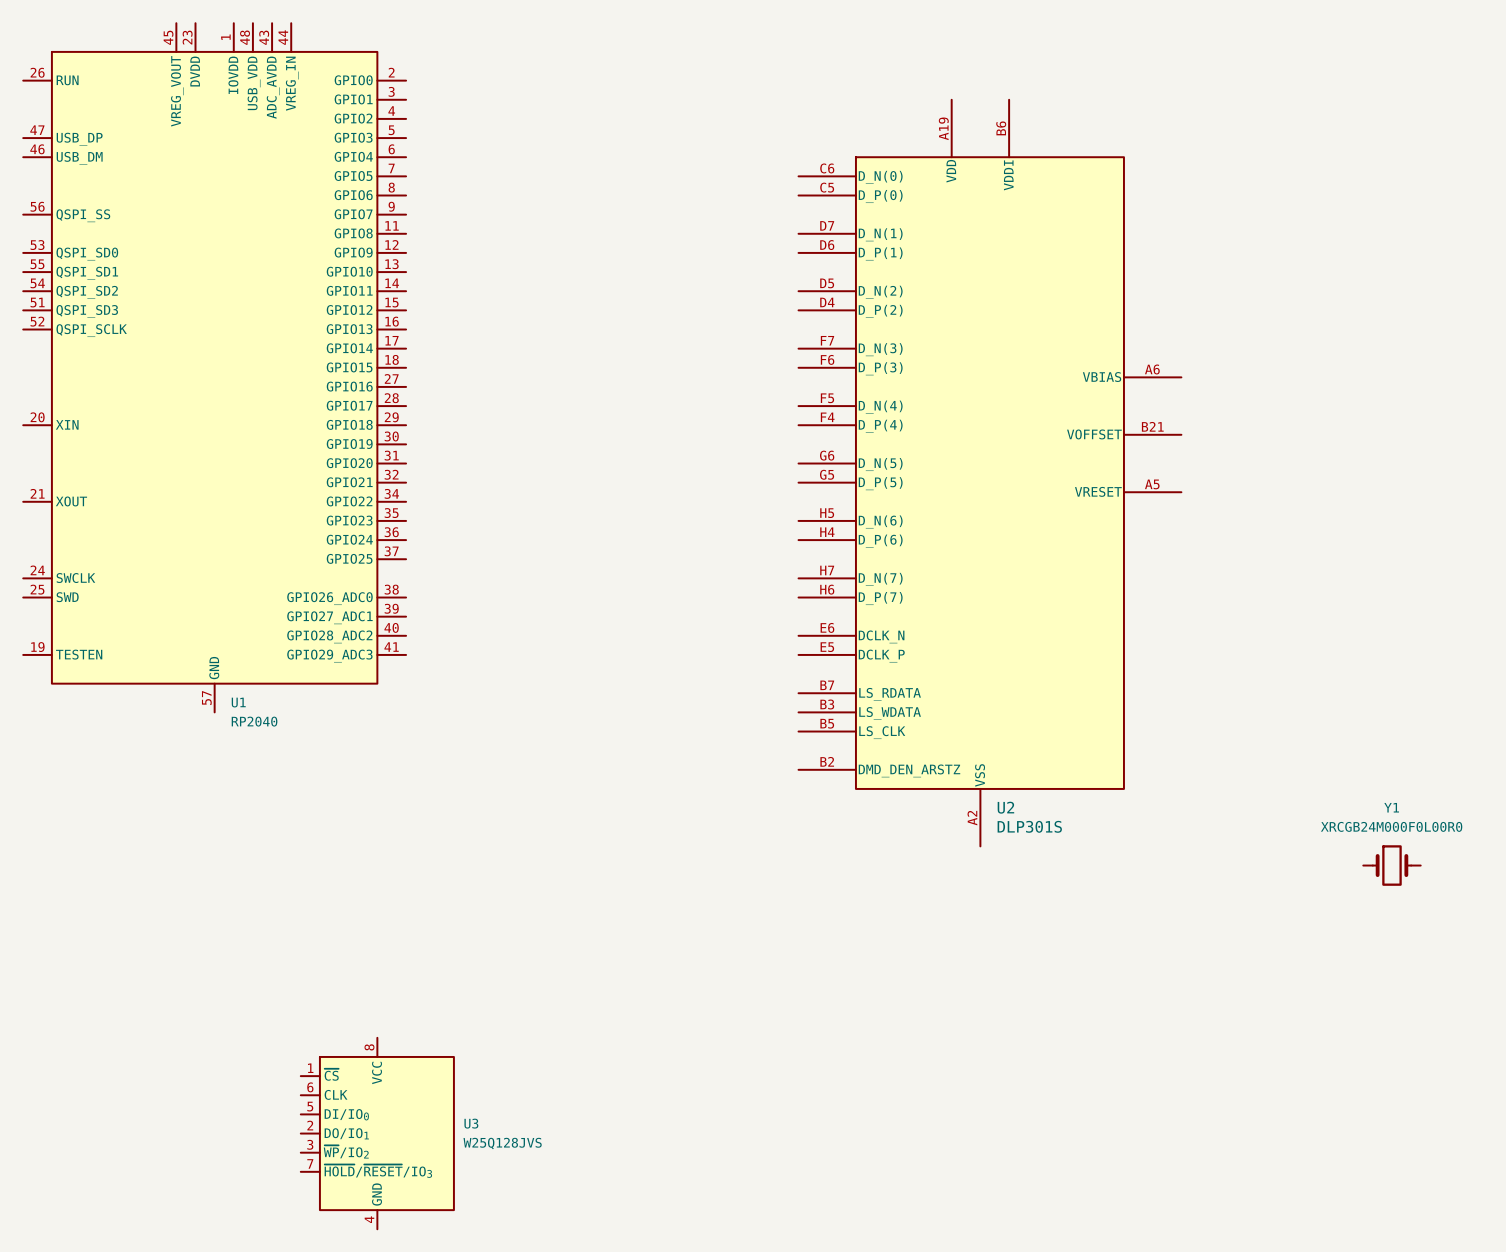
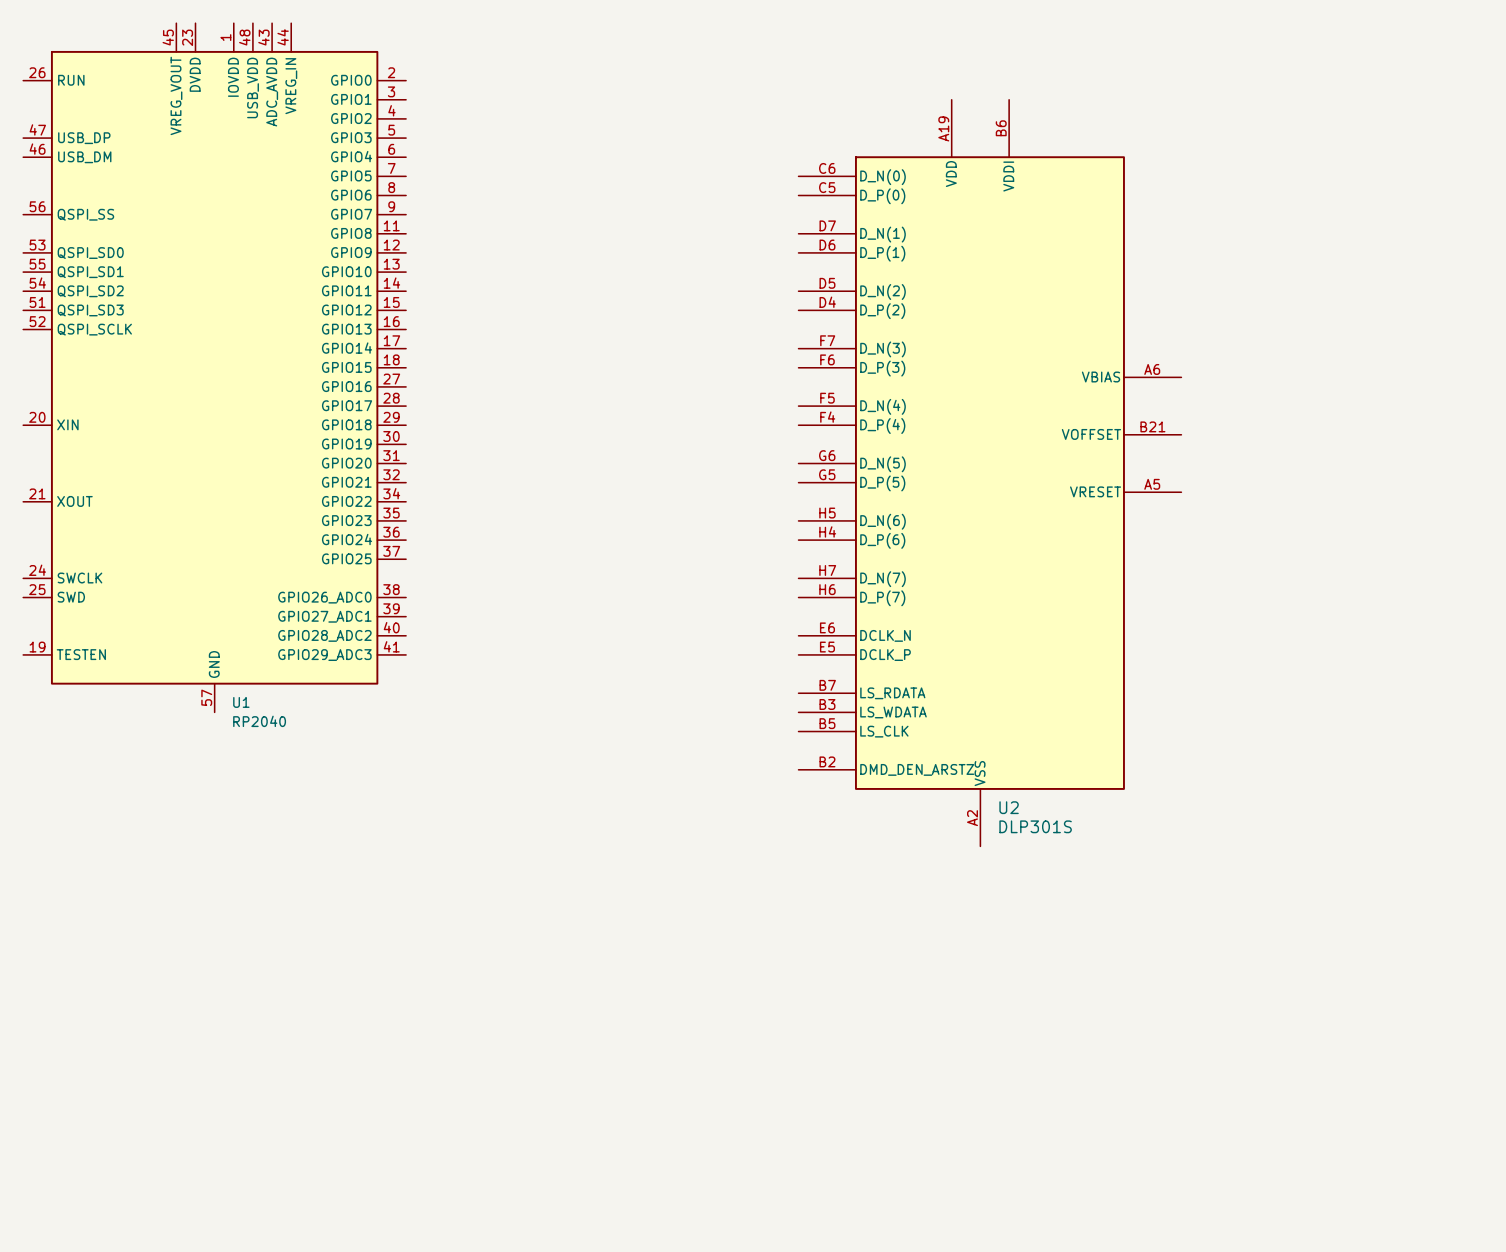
Y1: XRCGB24M000F0L00R0 (1391, 865) -> none
U3: W25Q128JVS (377, 1133) -> none

